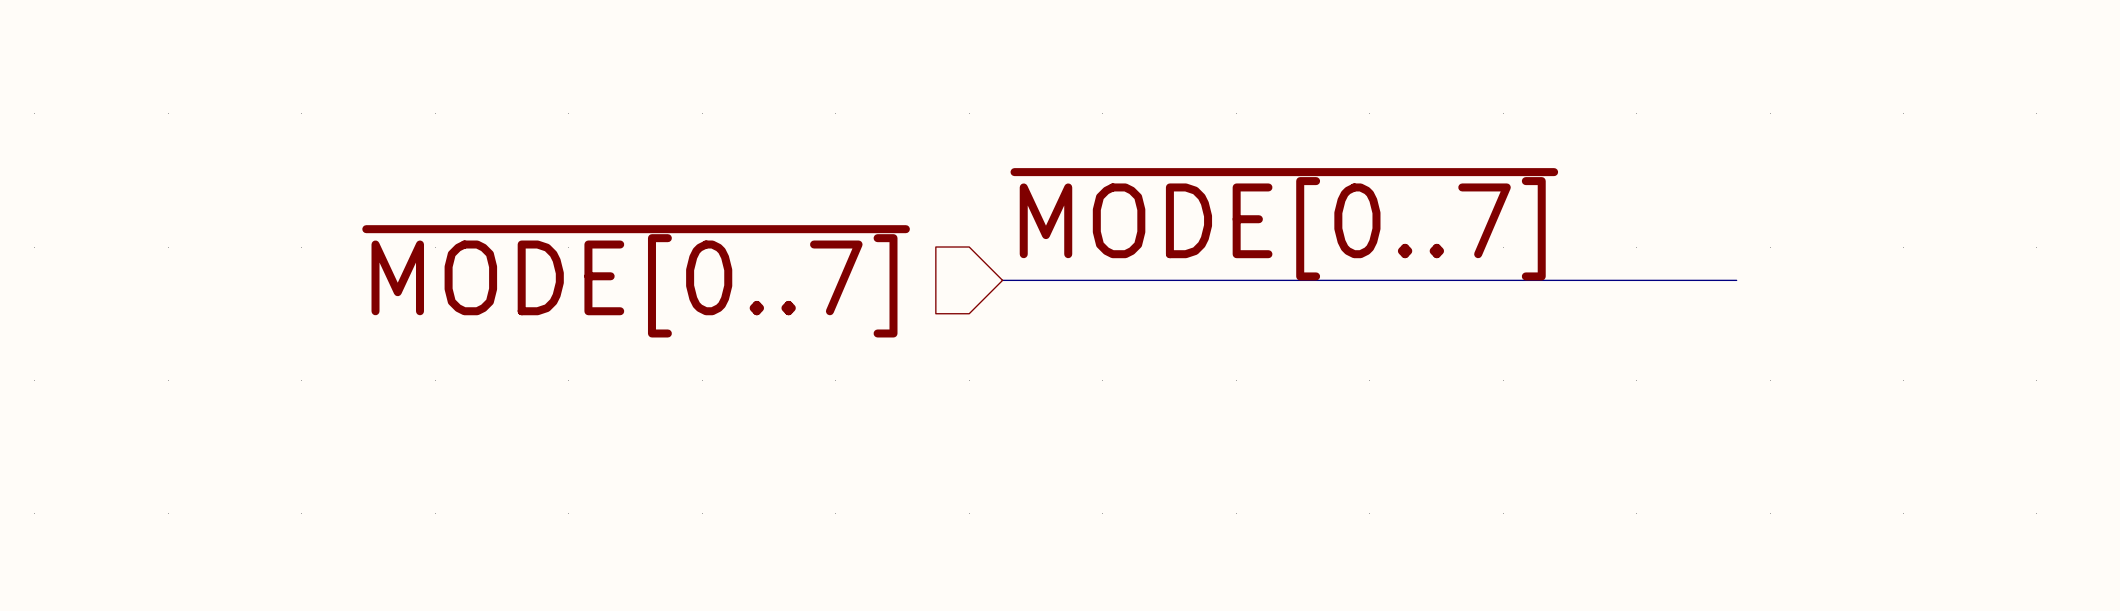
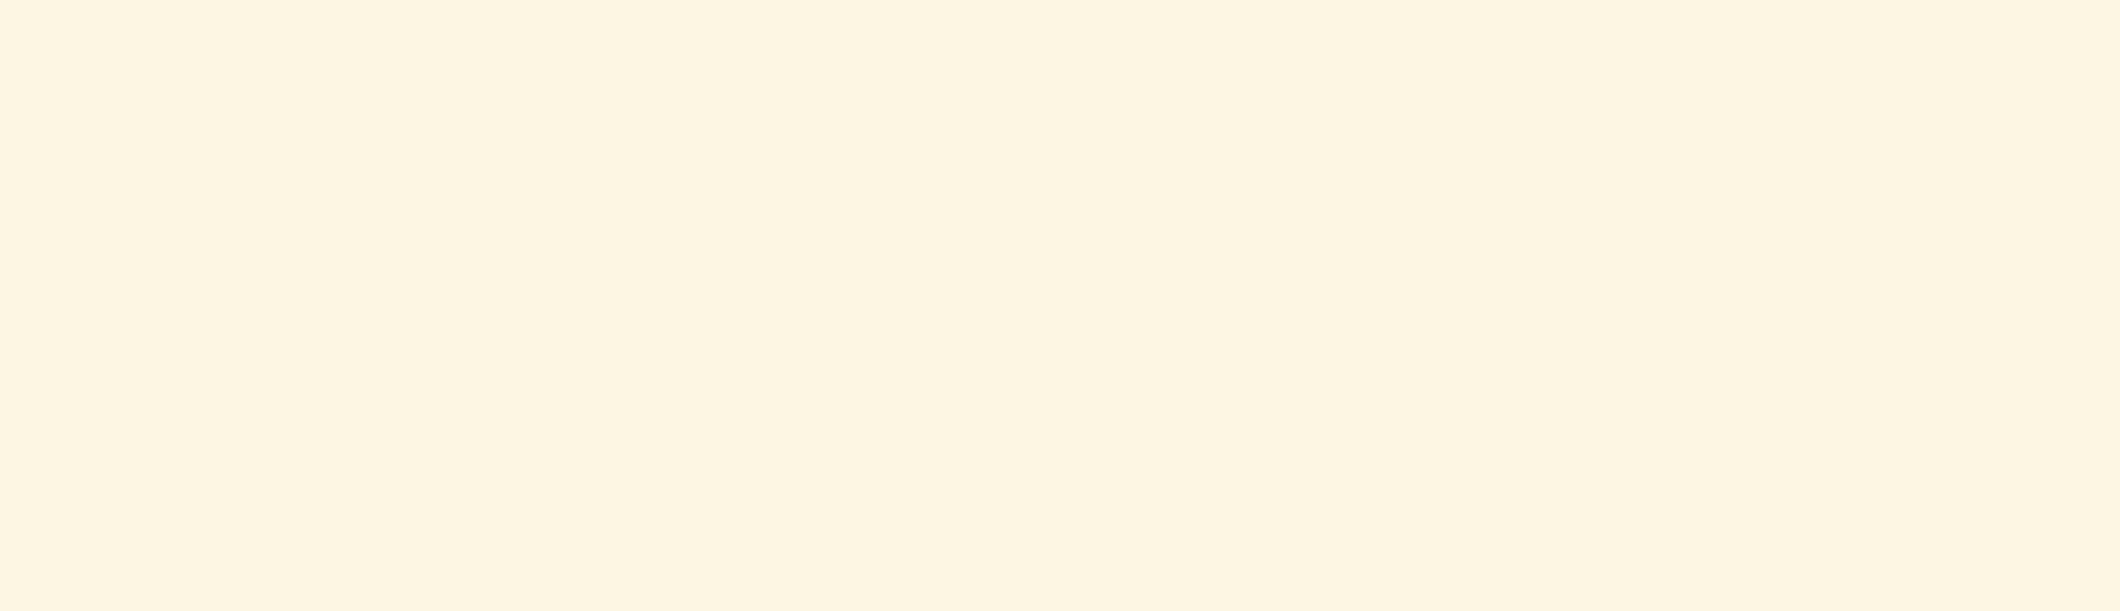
label: ~{MODE[0..7]} (1284, 224) -> none
bus: (1002, 280) (1736, 280) -> none
hierarchical label: ~{MODE[0..7]} (636, 281) -> none

